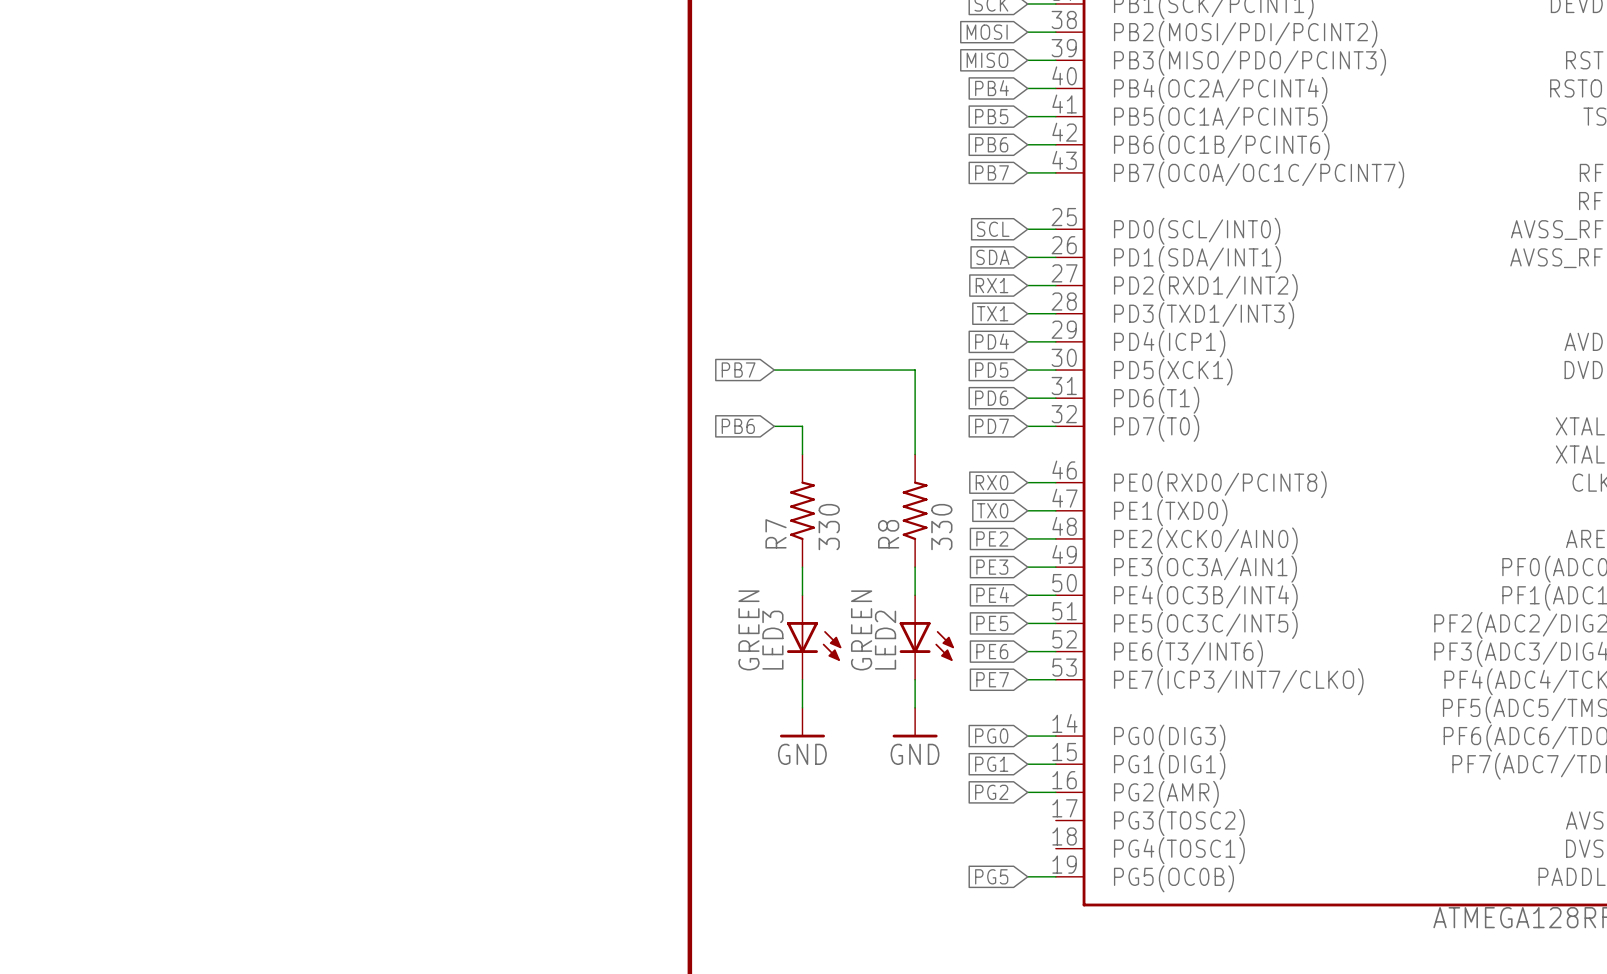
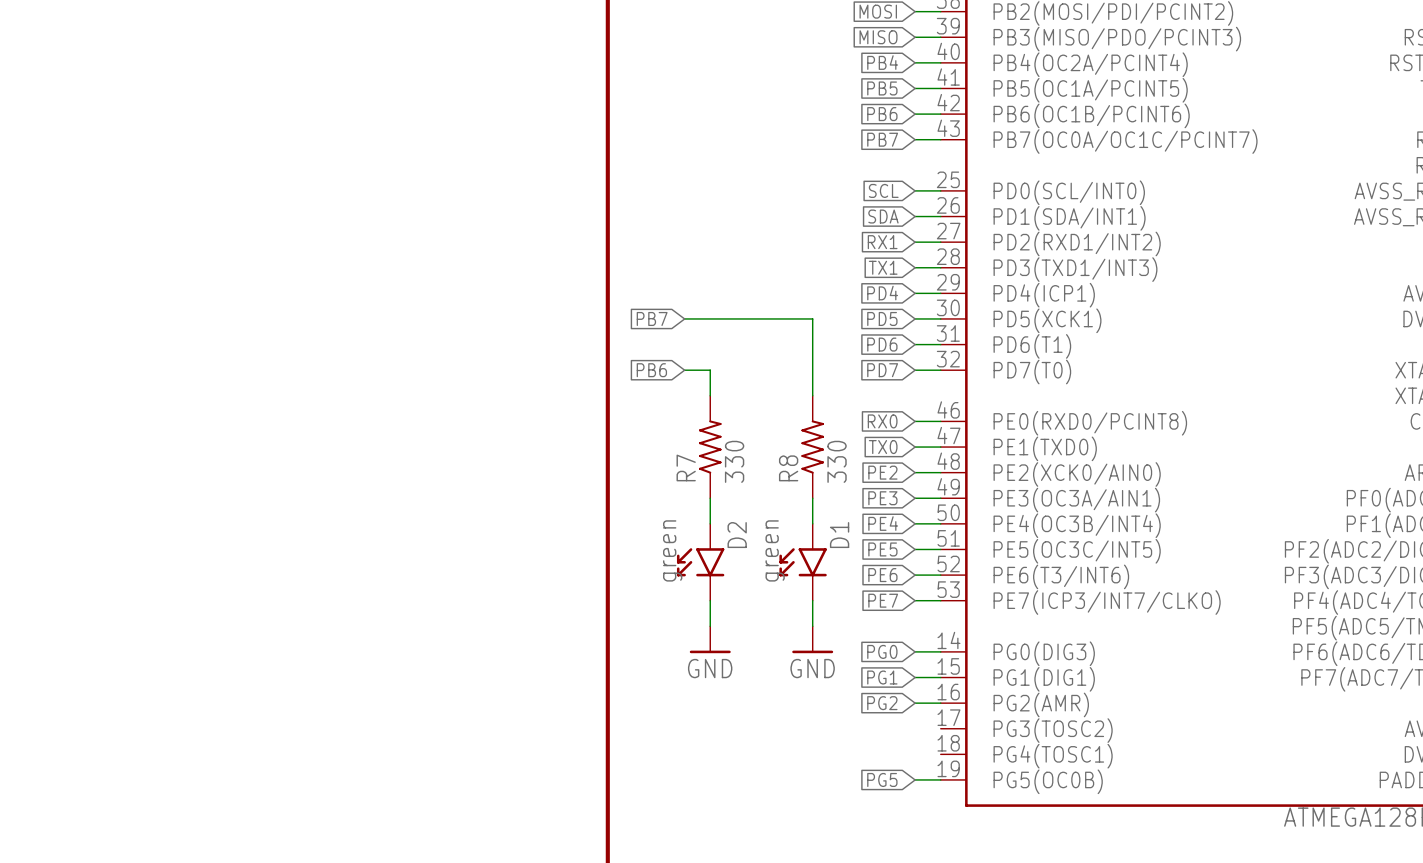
D2: none -> green (700, 562)
LED3: GREEN (814, 637) -> none
D1: none -> green (803, 562)
LED2: GREEN (926, 637) -> none

